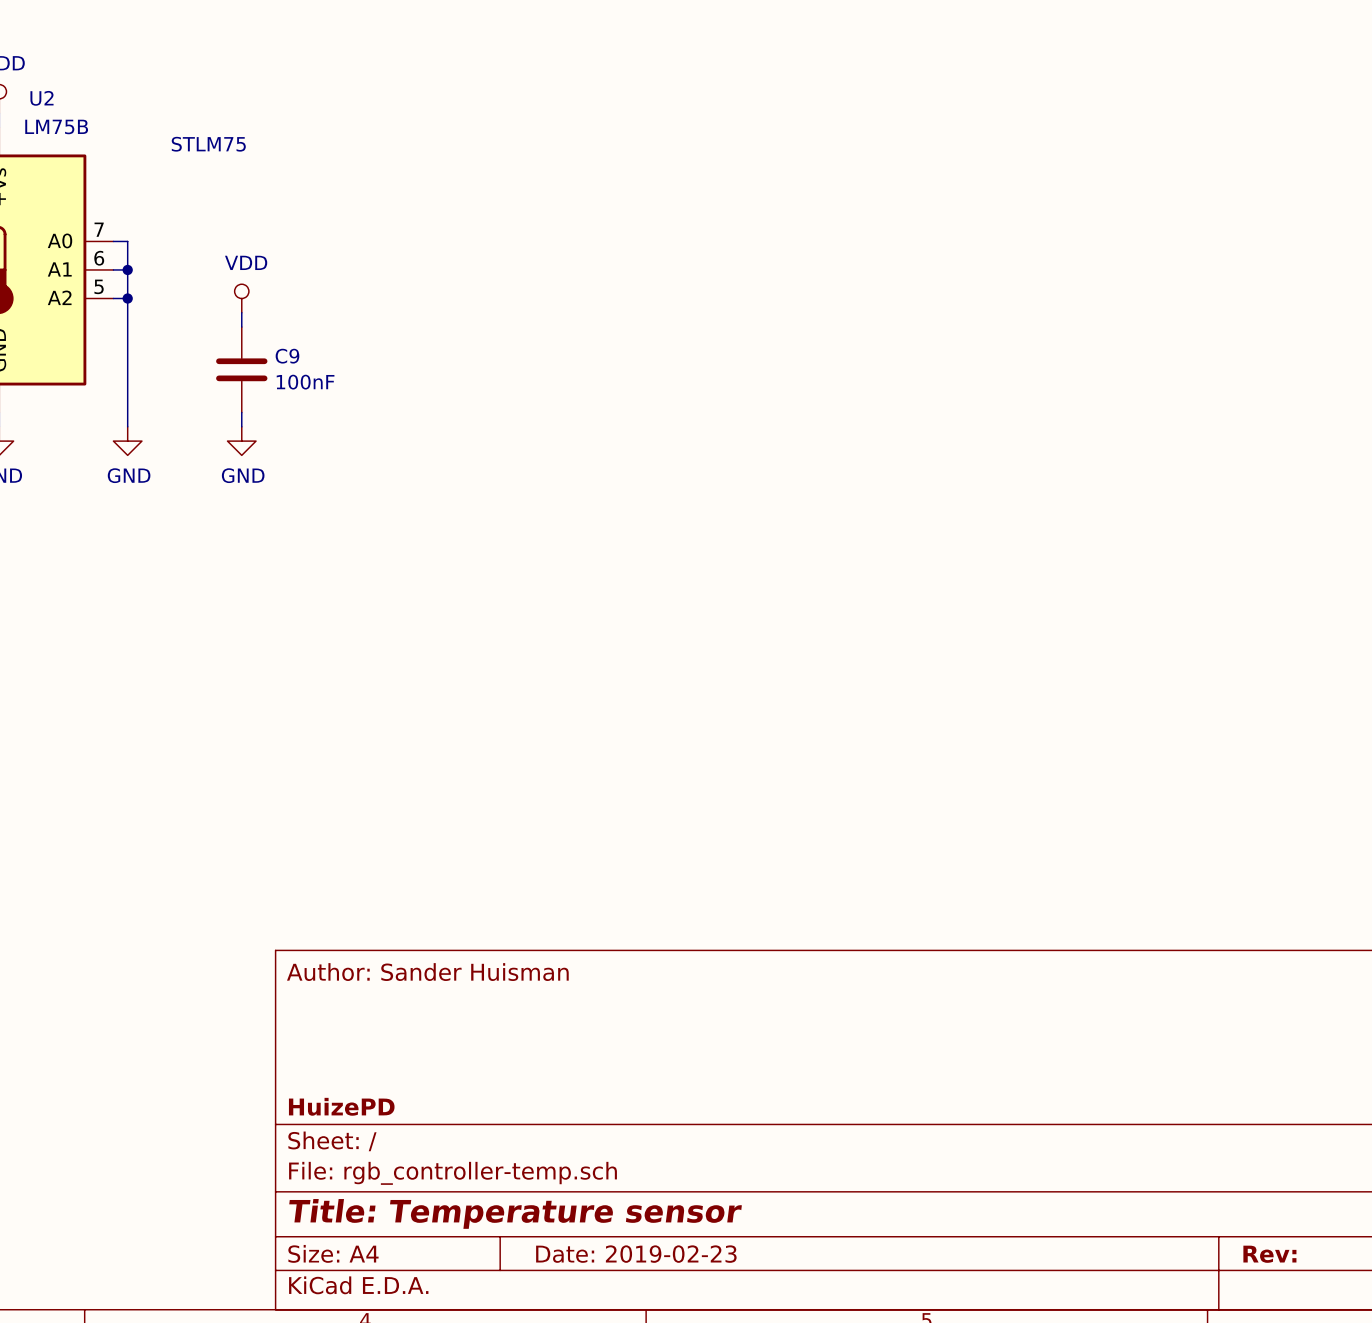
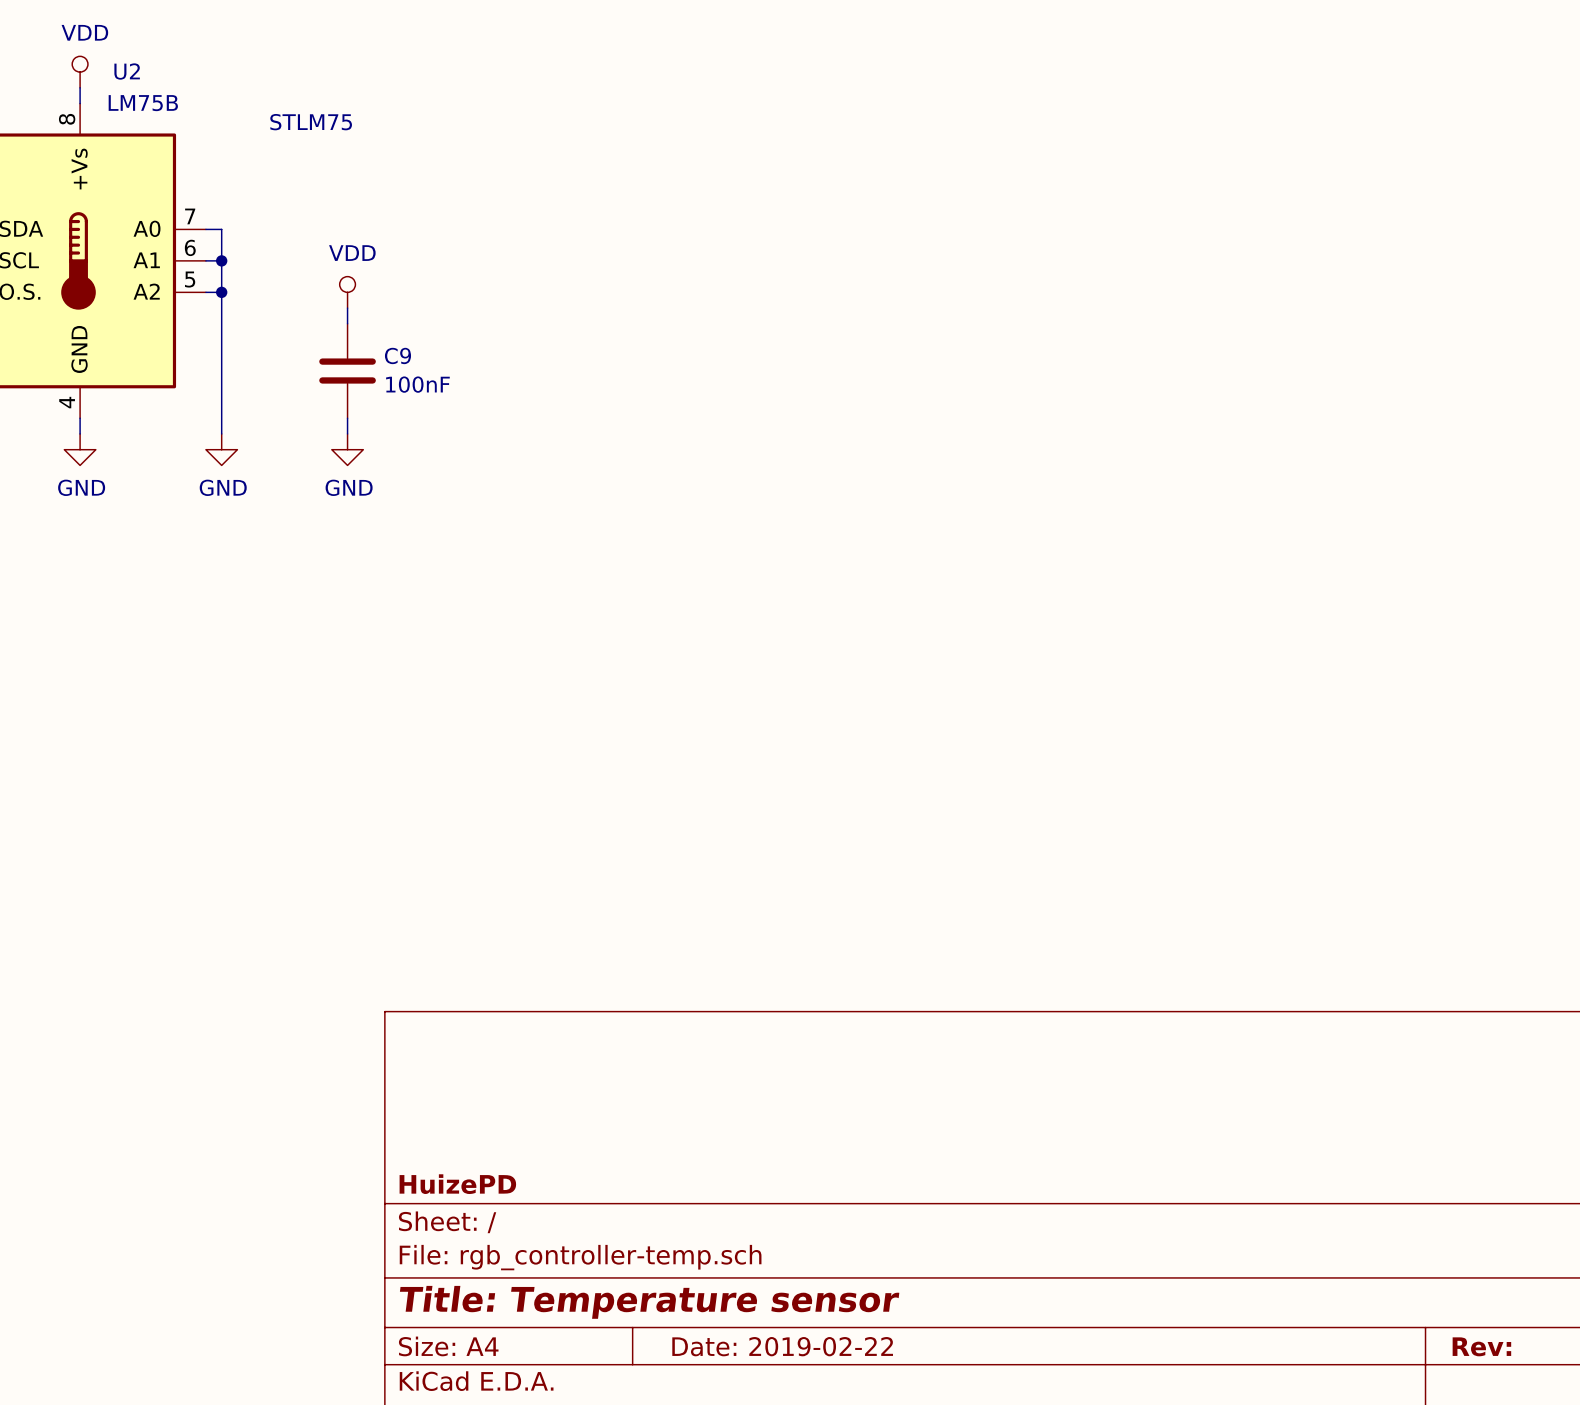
title block: Author: Sander Huisman (427, 972) -> none
title block: Date: 2019-02-23 (636, 1254) -> Date: 2019-02-22 (782, 1346)

